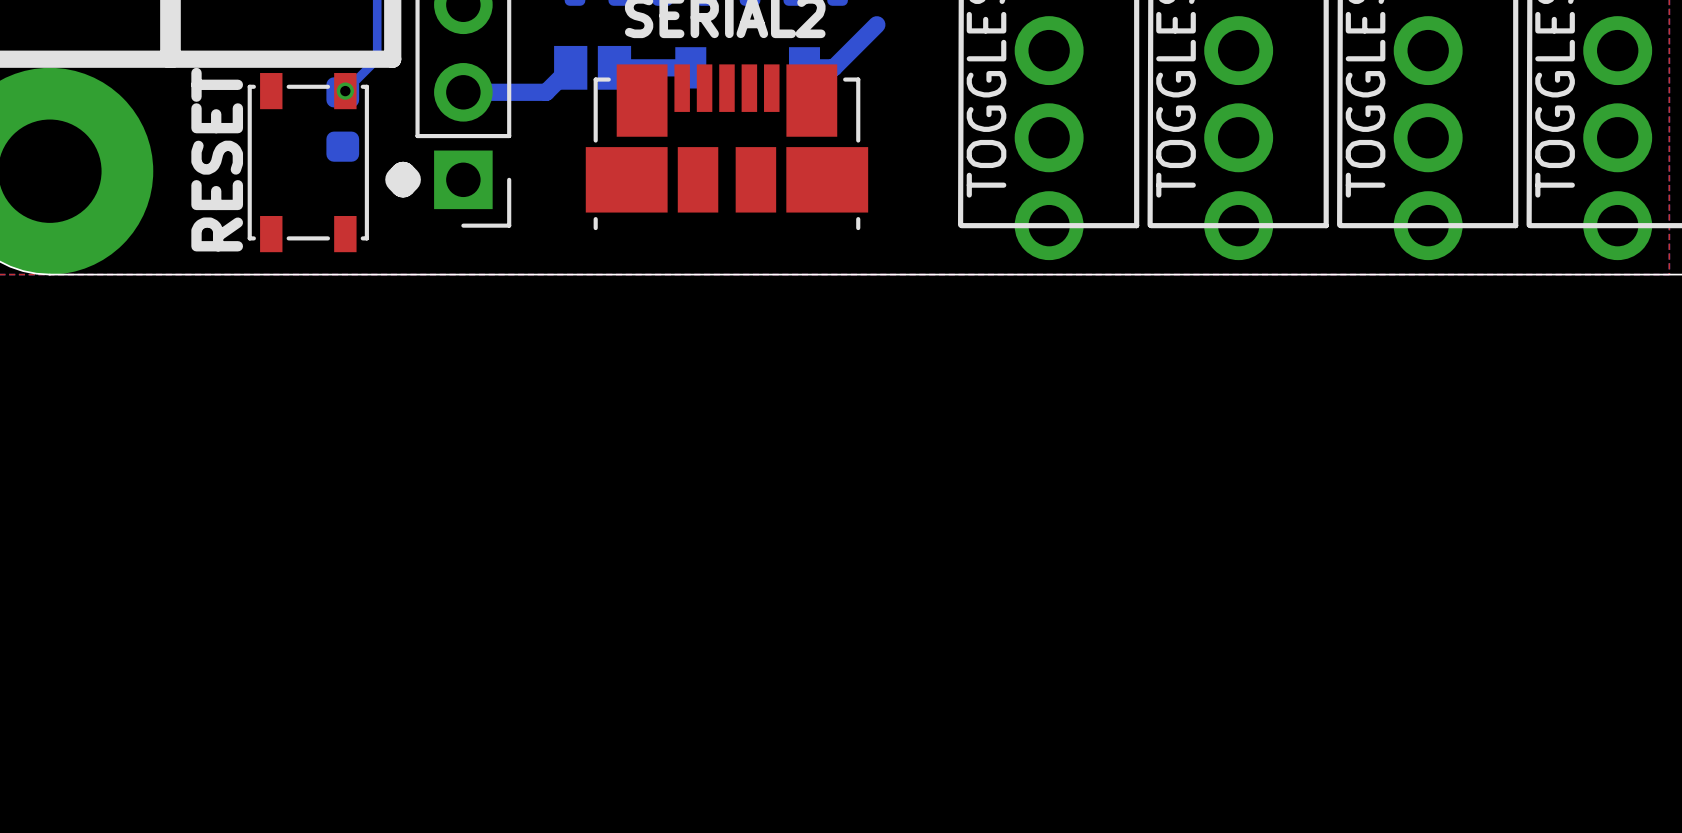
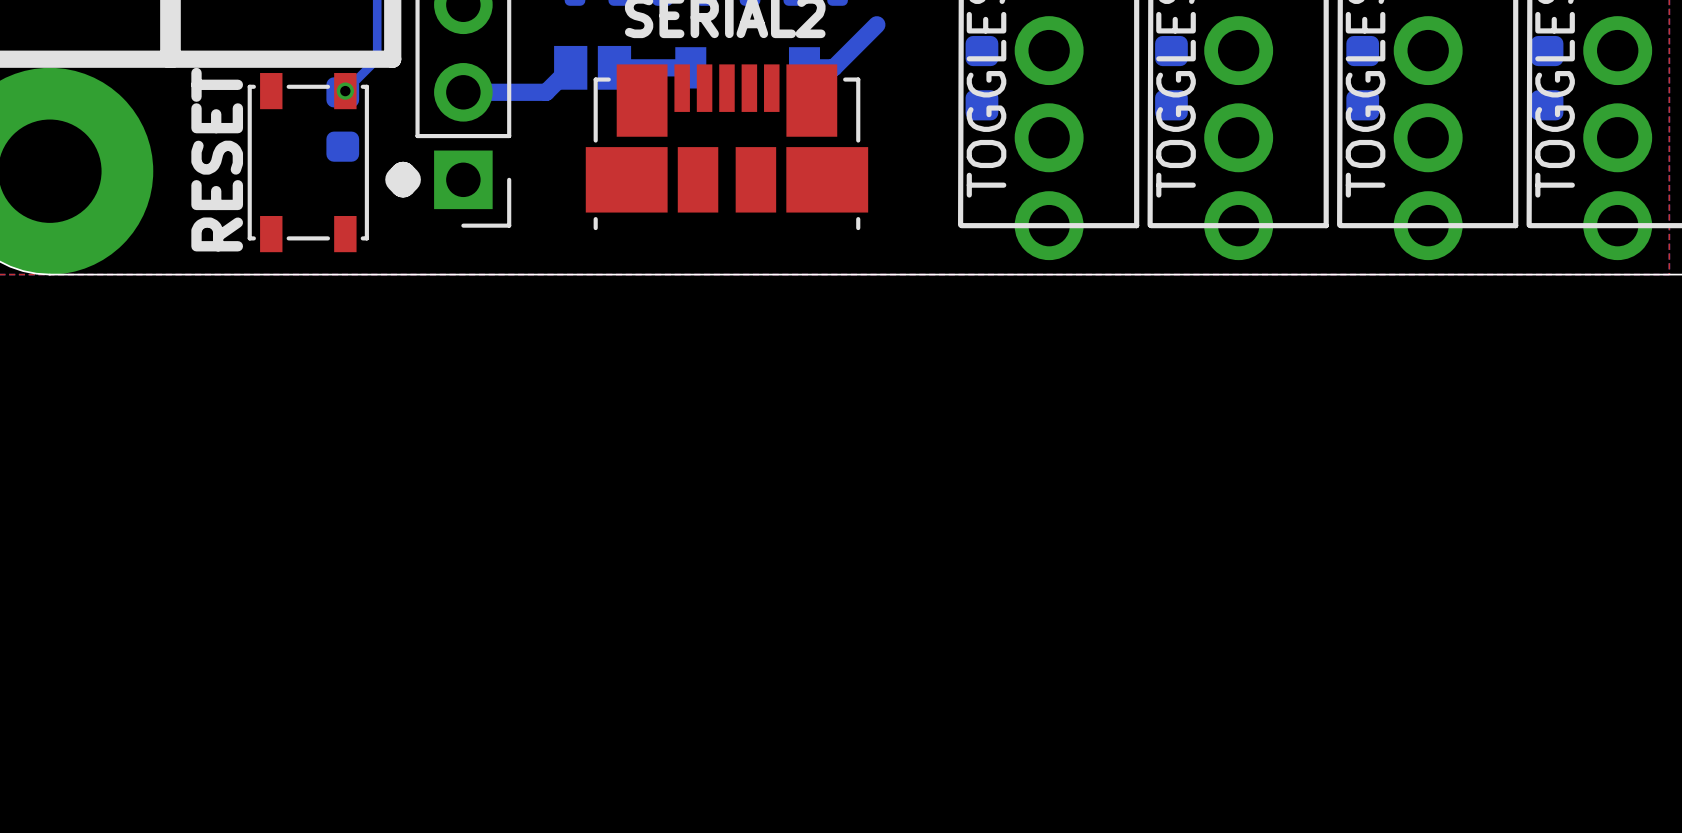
part: none -> (981, 78)
part: none -> (1171, 78)
part: none -> (1362, 78)
part: none -> (1547, 78)

